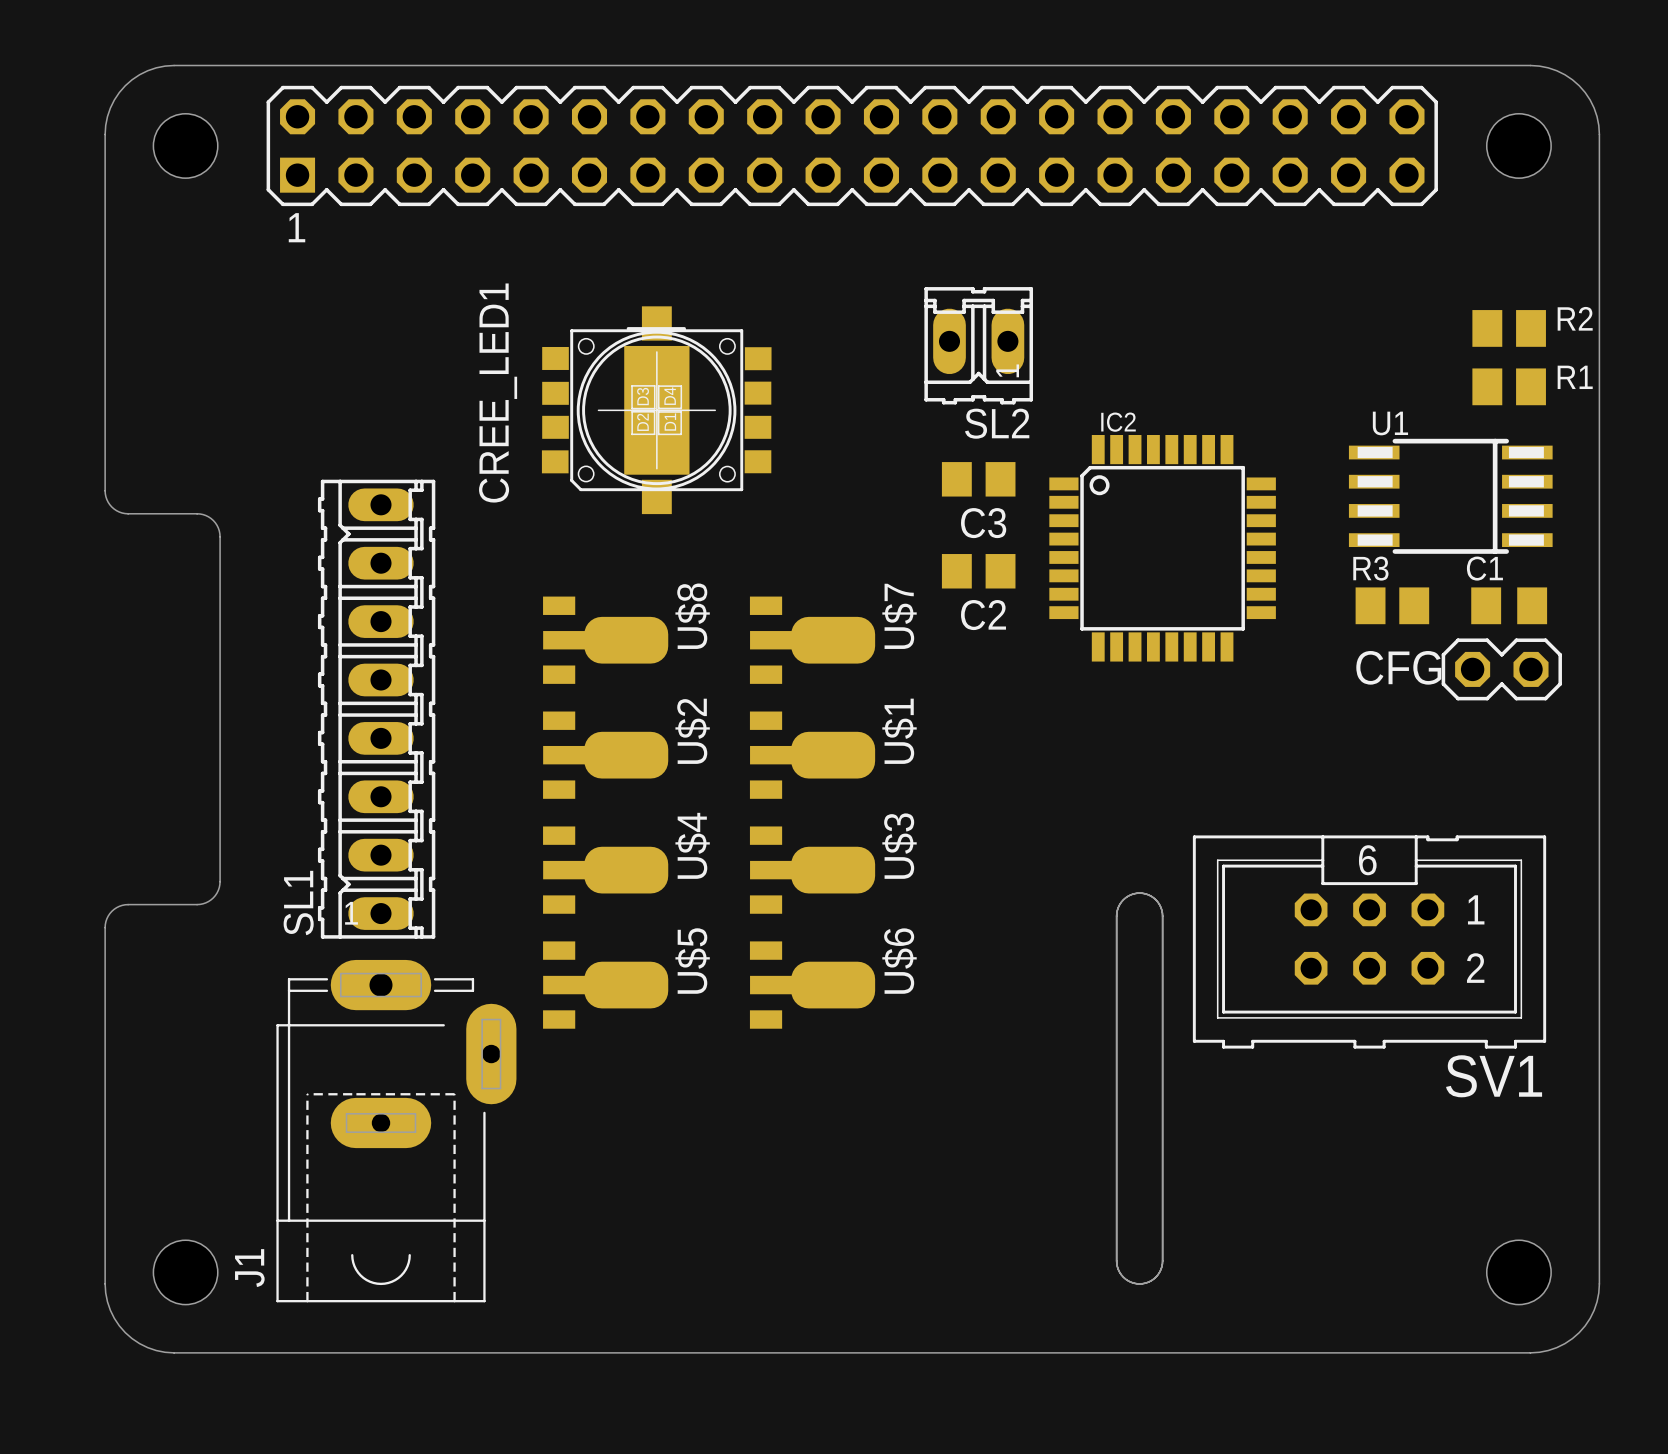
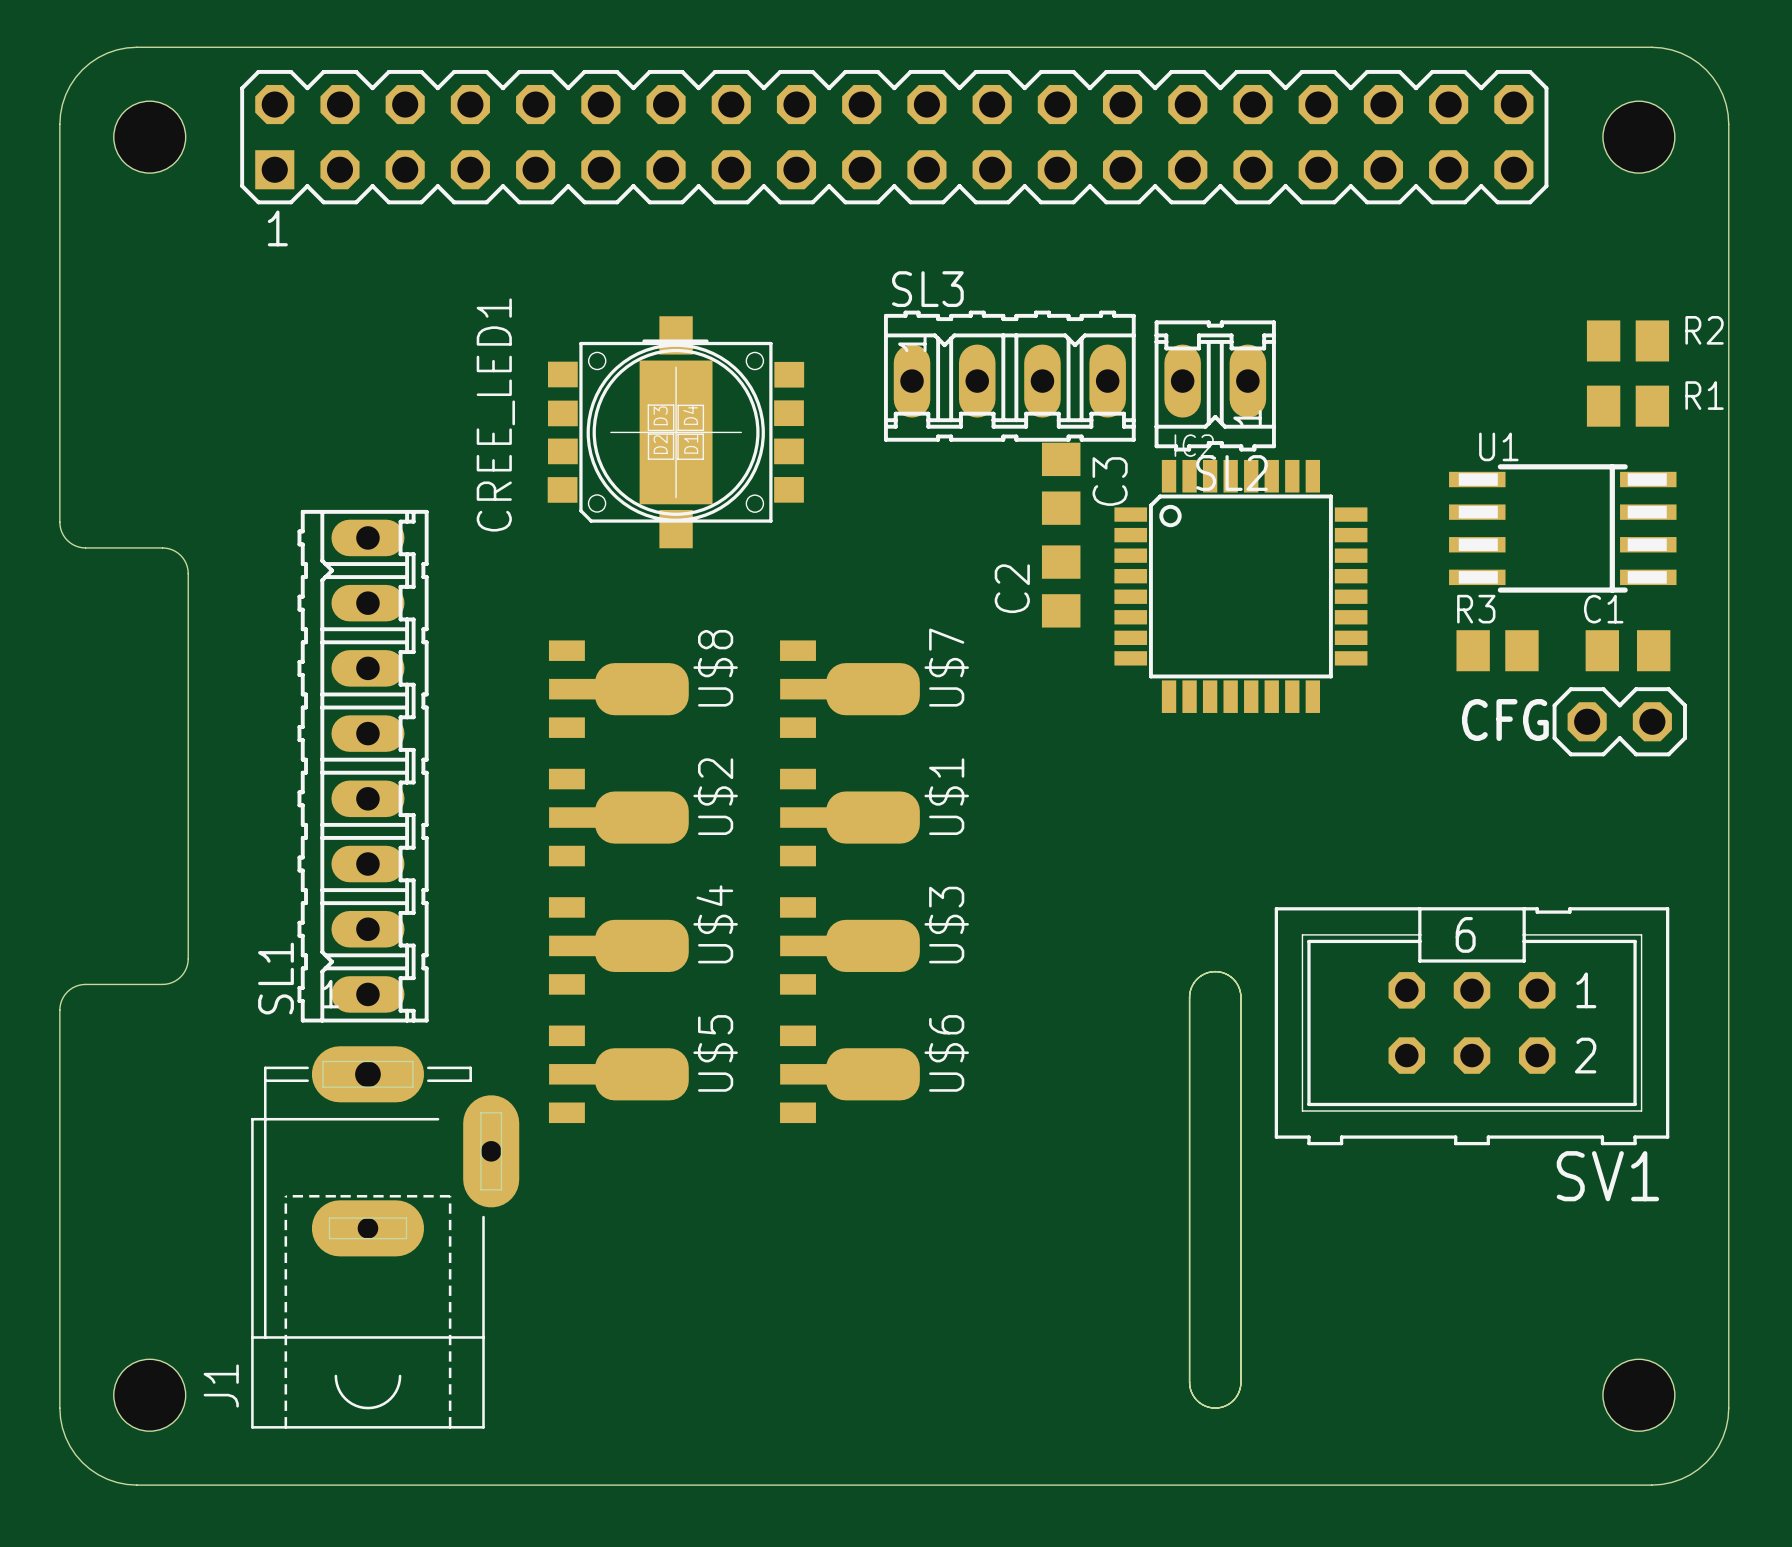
SL2 position: (978, 345) -> (1215, 385)
SL3: none -> (1009, 376)
C3 rotation: 0° (978, 479) -> 90° clockwise (1061, 483)
C3 name position: C3 (983, 523) -> C3 (1110, 481)
C2 rotation: 0° (978, 571) -> 90° clockwise (1061, 586)

